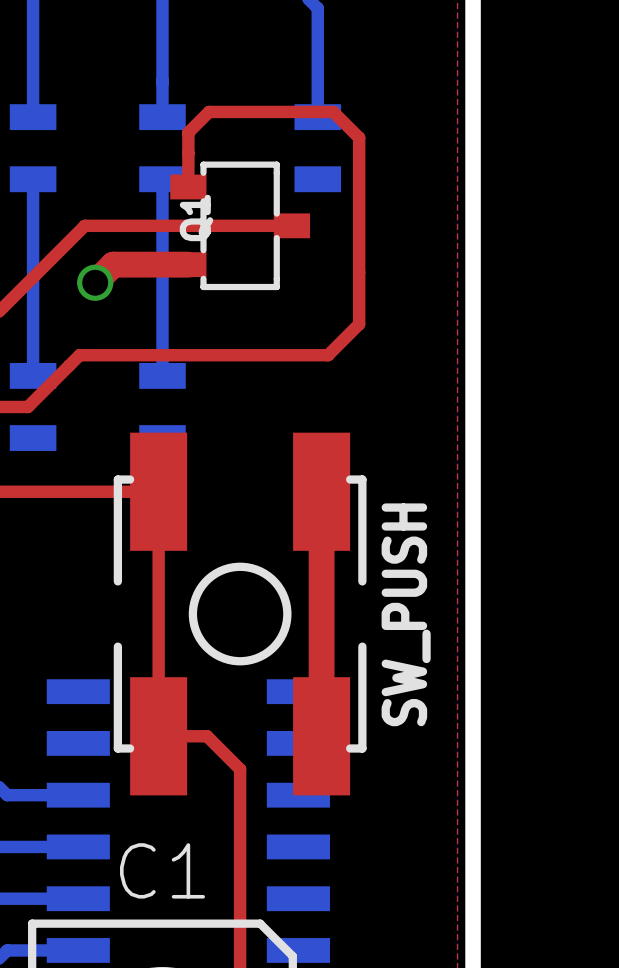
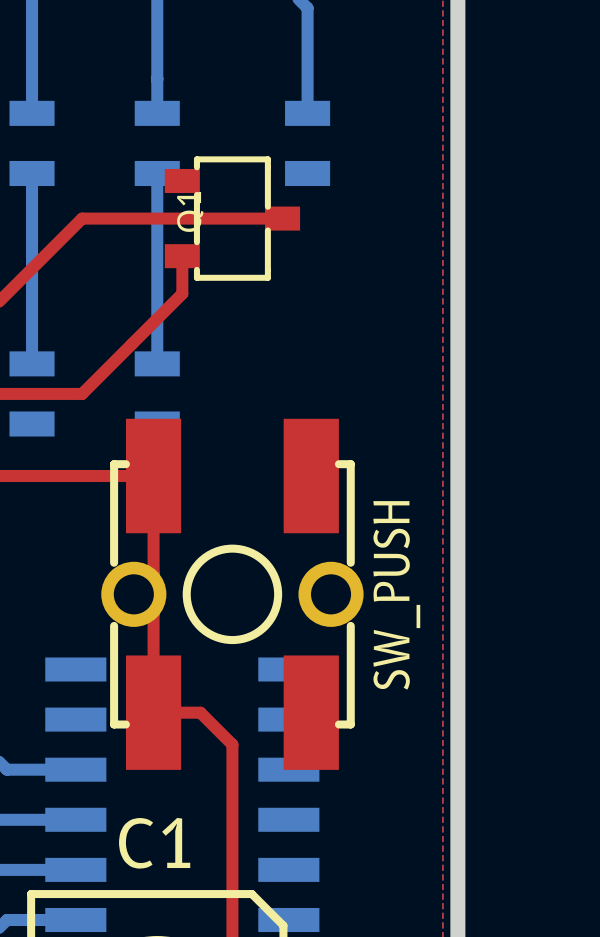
top track: (188, 187) (188, 132) (209, 111) (333, 111) (359, 137) (359, 324) (328, 355) (79, 355) (27, 406) -> (182, 256) (182, 293) (82, 393) (27, 393)
top track: (188, 264) (113, 264) (95, 282) -> none
via: (95, 282) -> none
part footprint: [113, 432, 367, 796] -> [101, 418, 364, 770]
top track: (321, 491) (321, 736) -> none

